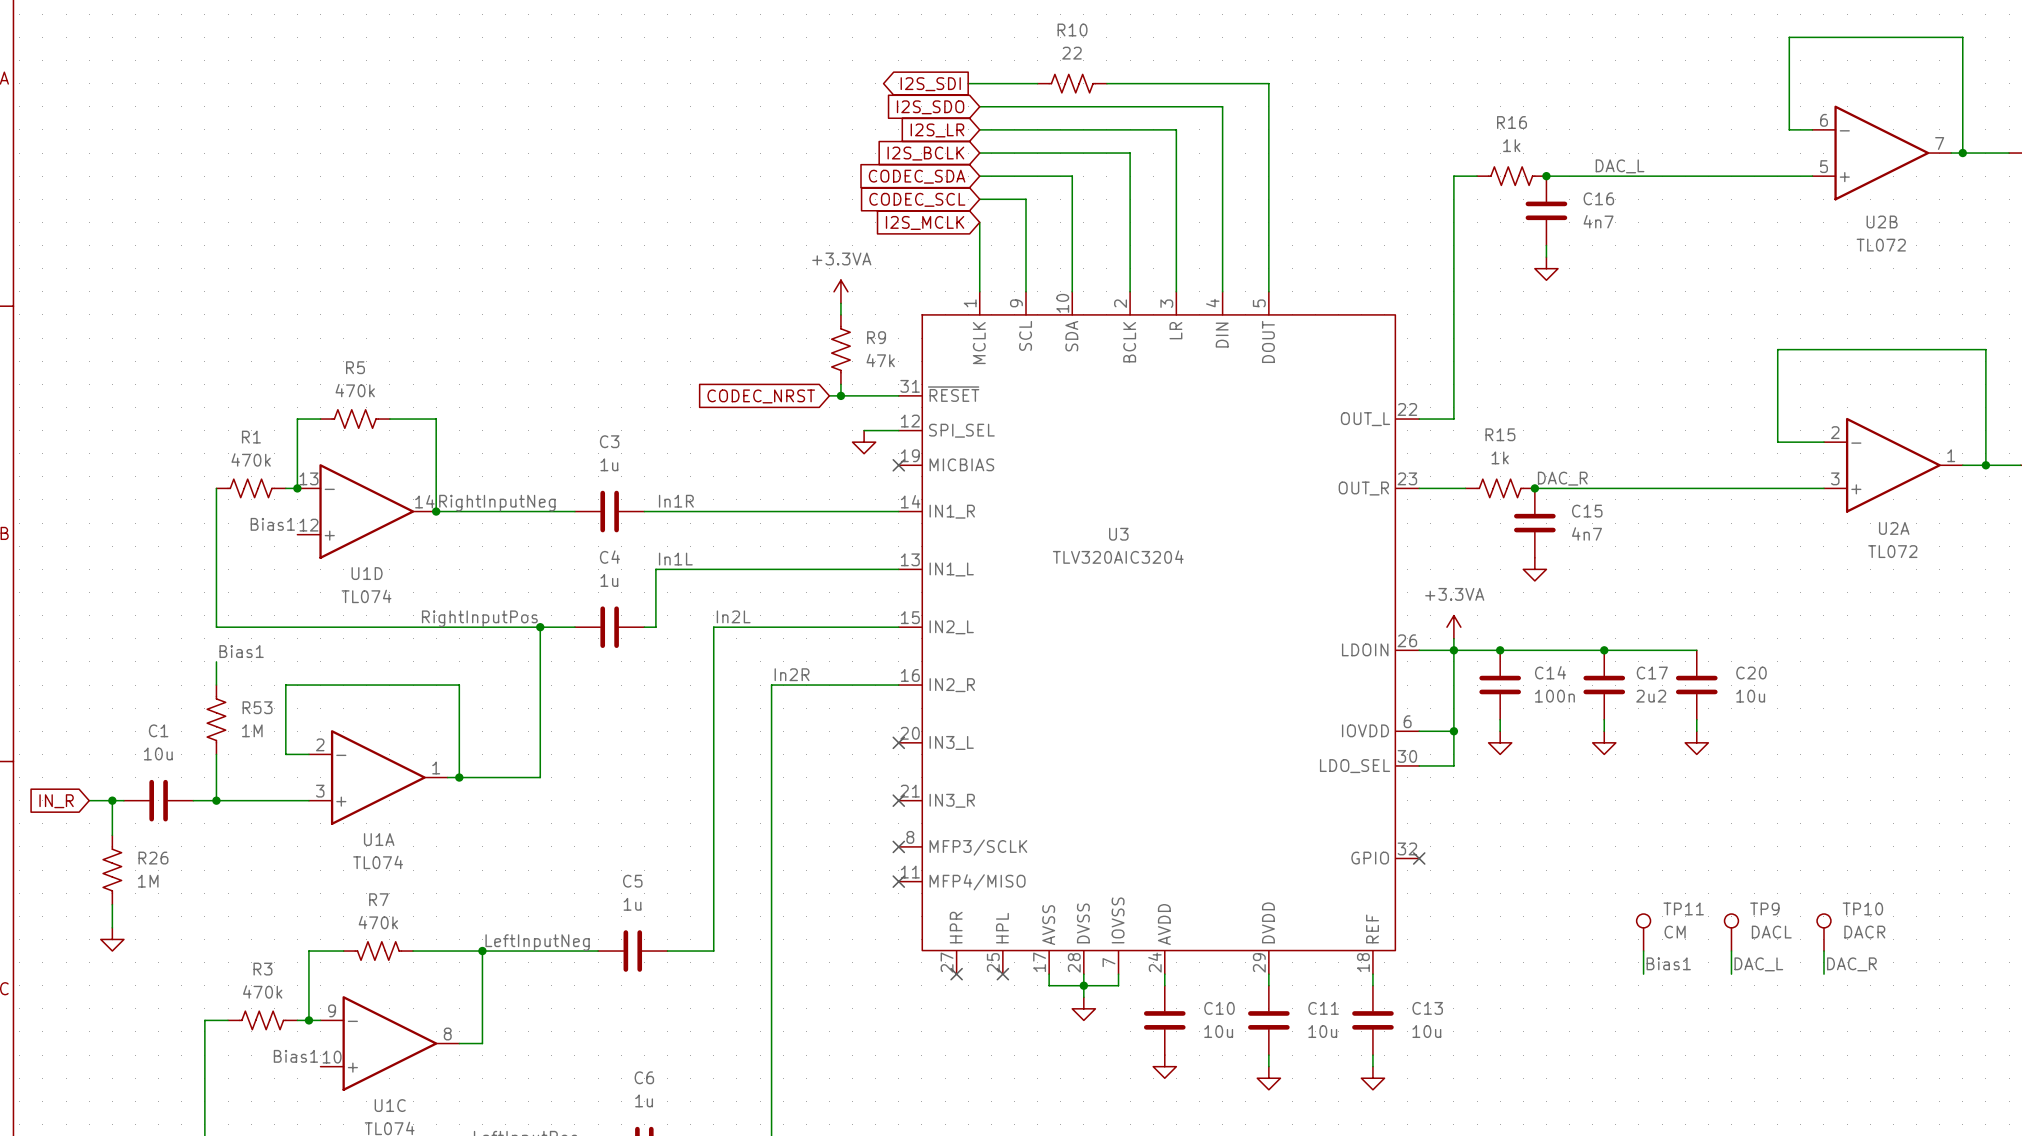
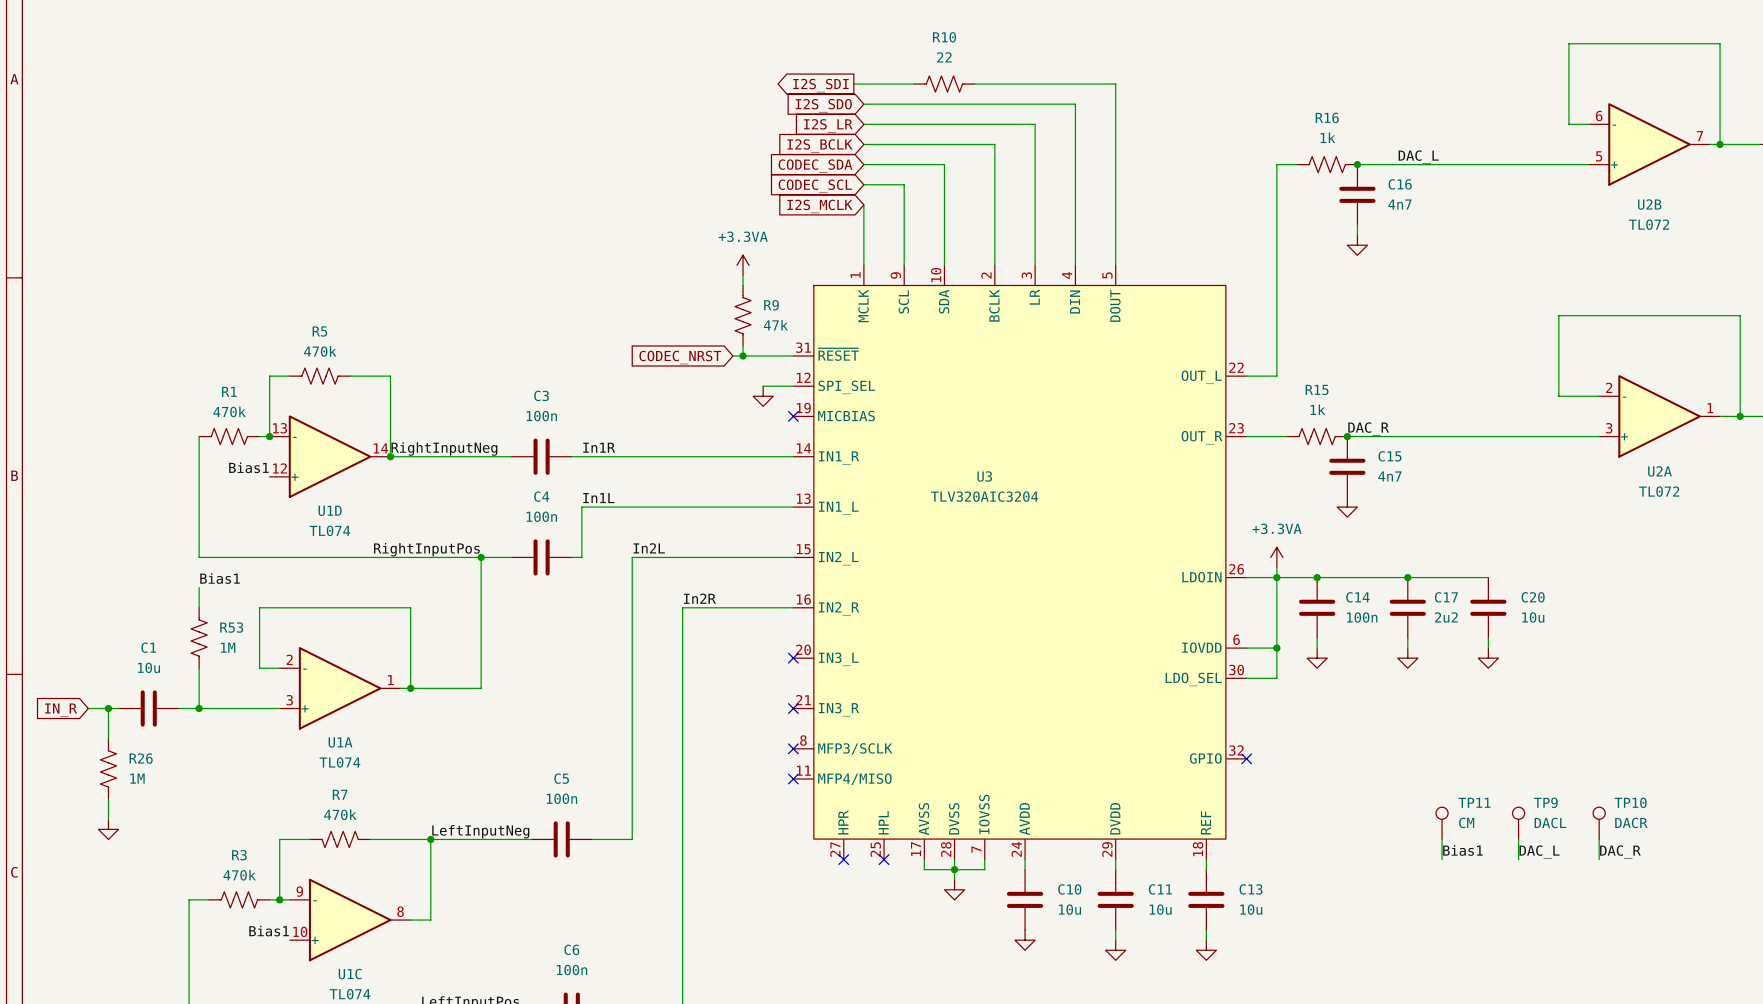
C3 value: 1u (609, 464) -> 100n (541, 416)
C4 value: 1u (609, 580) -> 100n (541, 516)
C5 value: 1u (632, 904) -> 100n (561, 798)
C6 value: 1u (644, 1100) -> 100n (572, 970)

